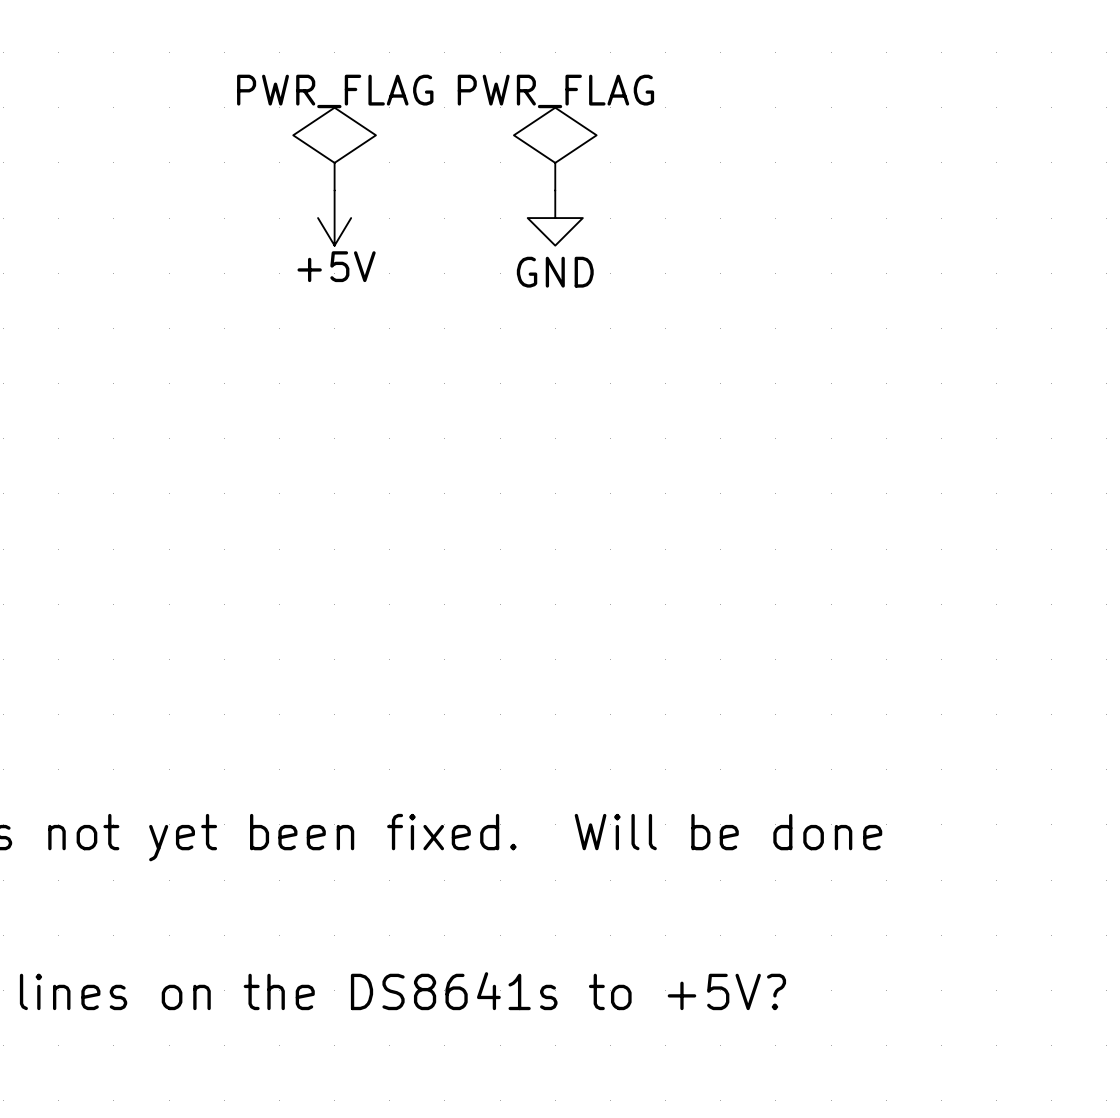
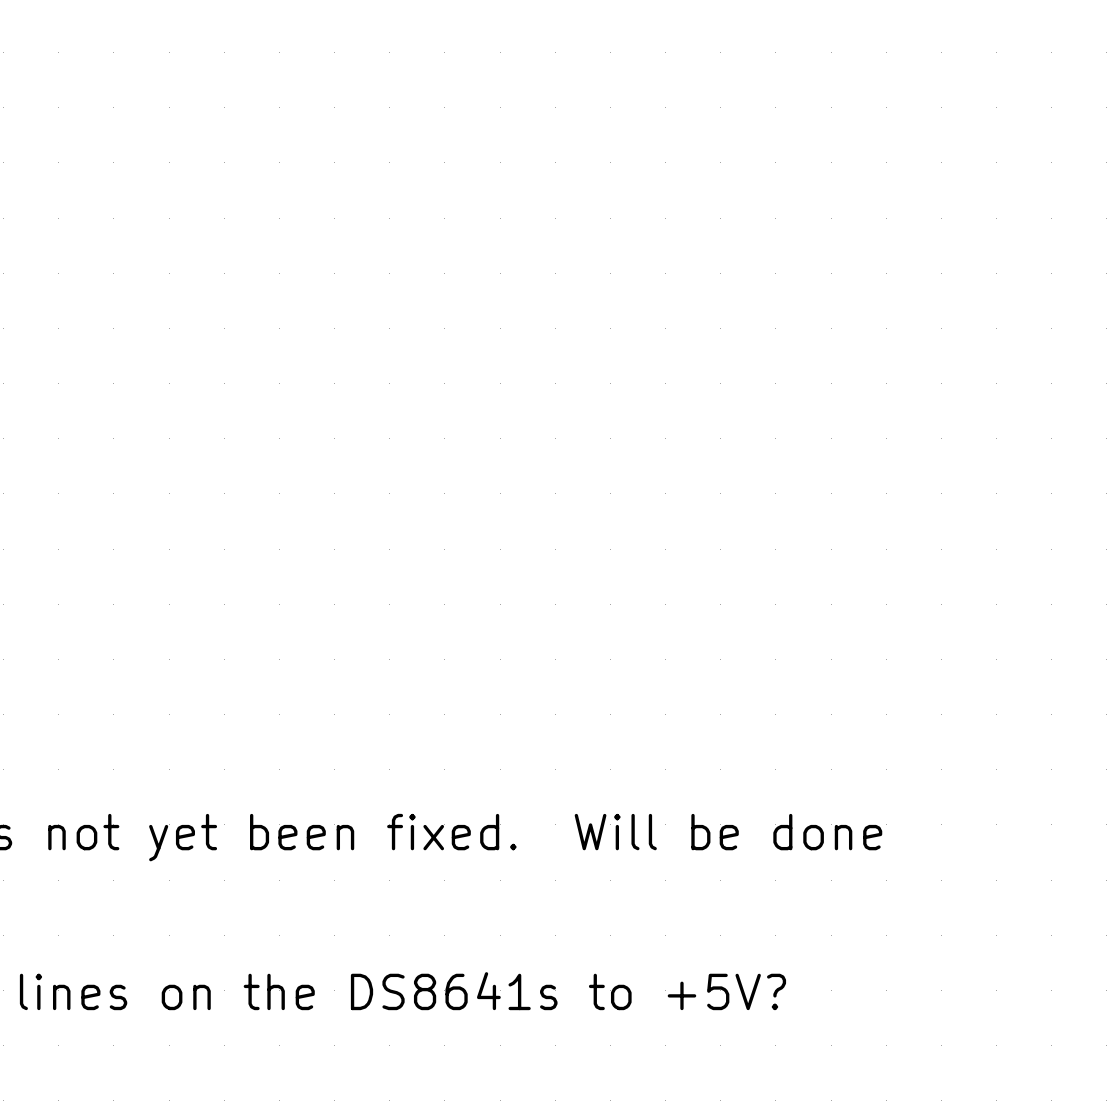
power symbol: PWR_FLAG (334, 149) -> none
power symbol: PWR_FLAG (555, 149) -> none
power symbol: +5V (334, 218) -> none
power symbol: GND (555, 218) -> none

